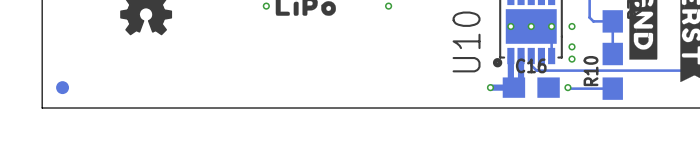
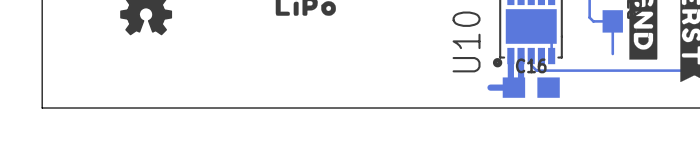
via: (266, 6) -> none
via: (388, 6) -> none
via: (510, 26) -> none
via: (531, 26) -> none
via: (551, 26) -> none
via: (572, 26) -> none
via: (572, 46) -> none
via: (572, 59) -> none
R10: (612, 71) -> none
part: (62, 87) -> none
via: (490, 87) -> none
track: (567, 87) (612, 88) -> none
via: (567, 87) -> none

